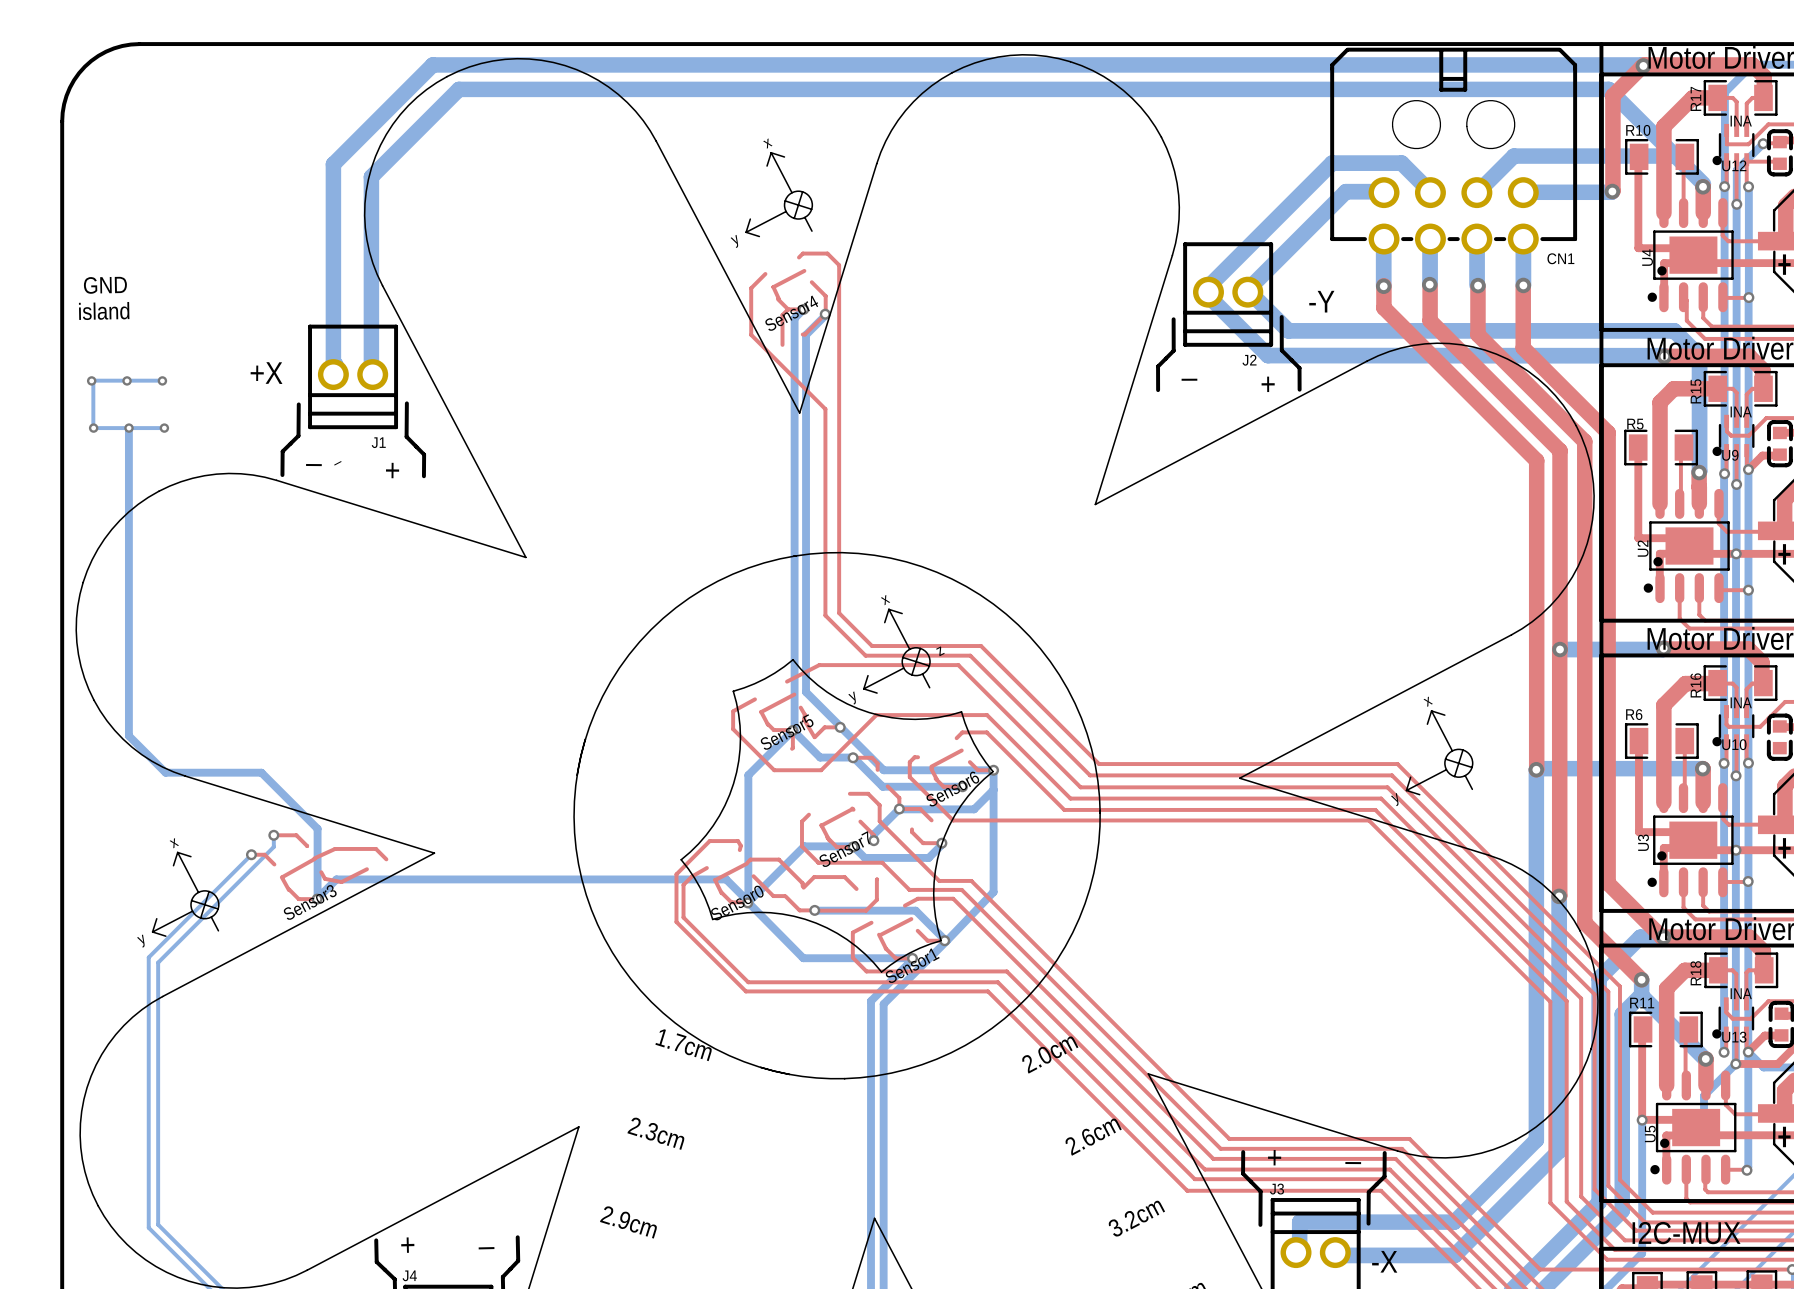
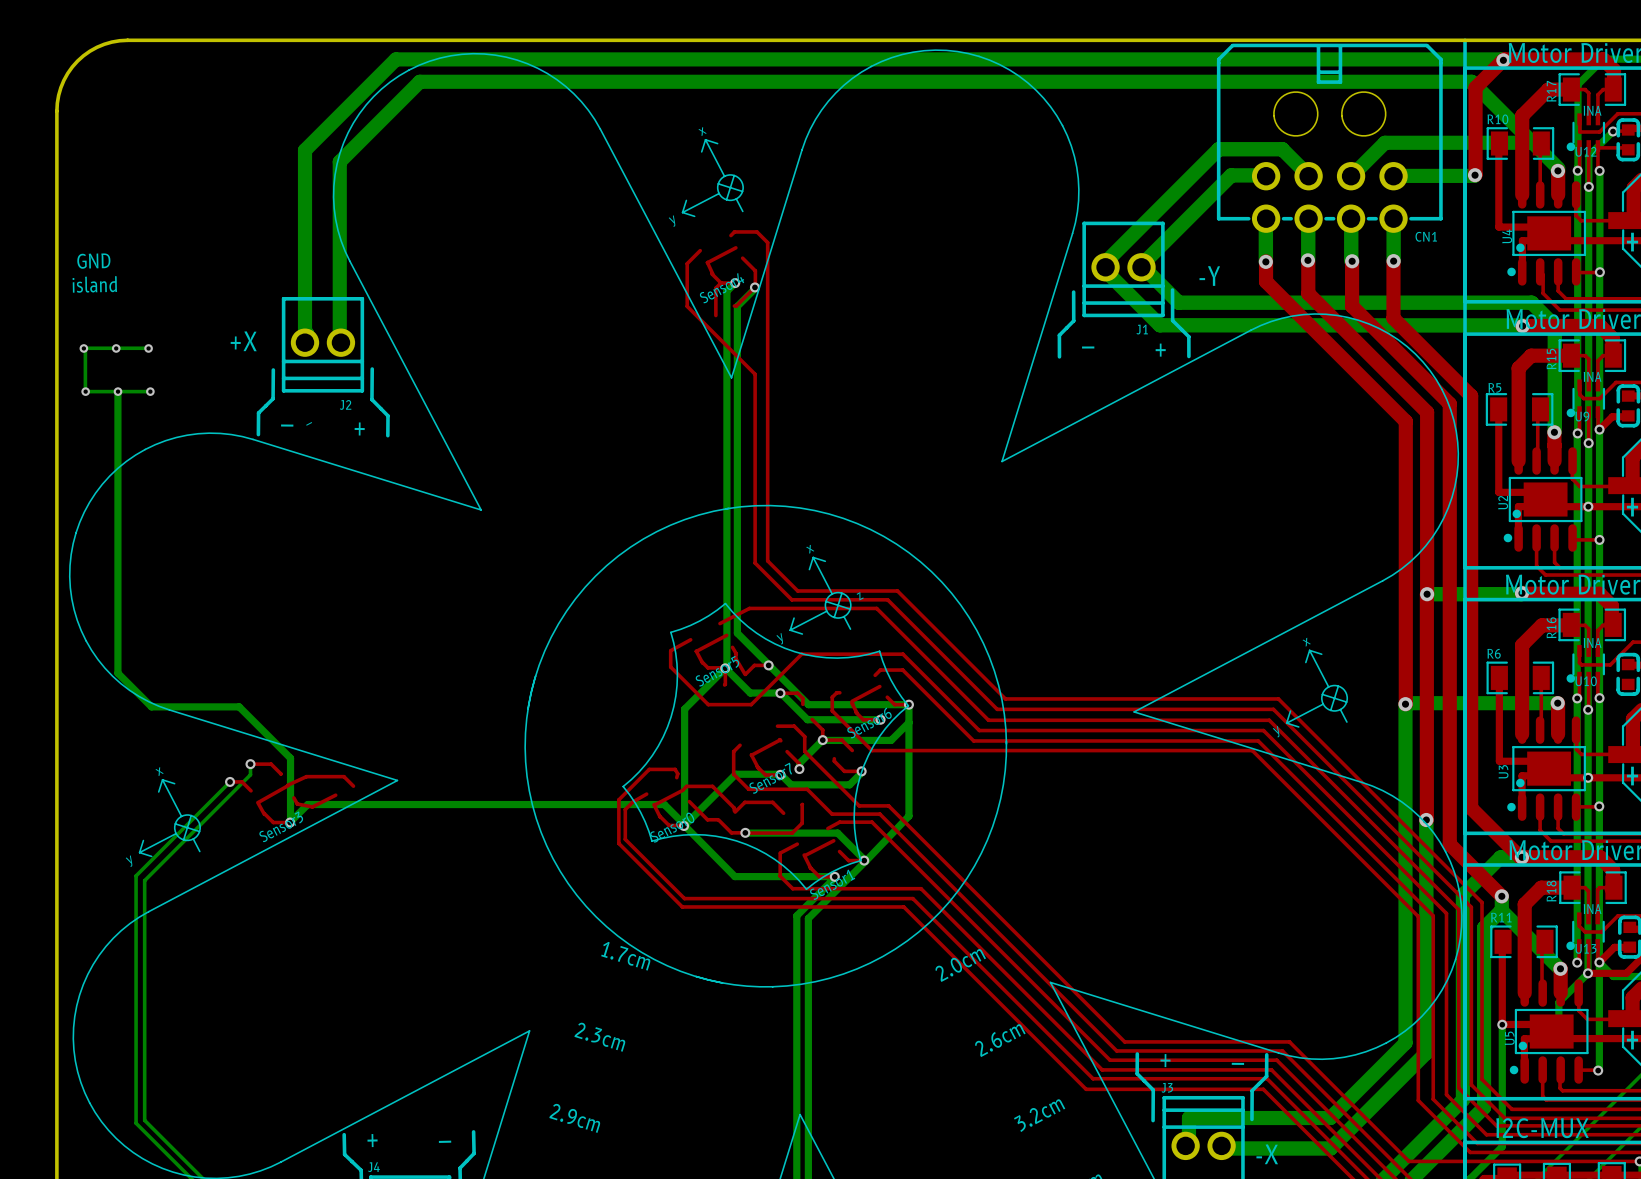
J2 name: J2 (1249, 360) -> J1 (1142, 329)
J1 name: J1 (378, 442) -> J2 (345, 404)

